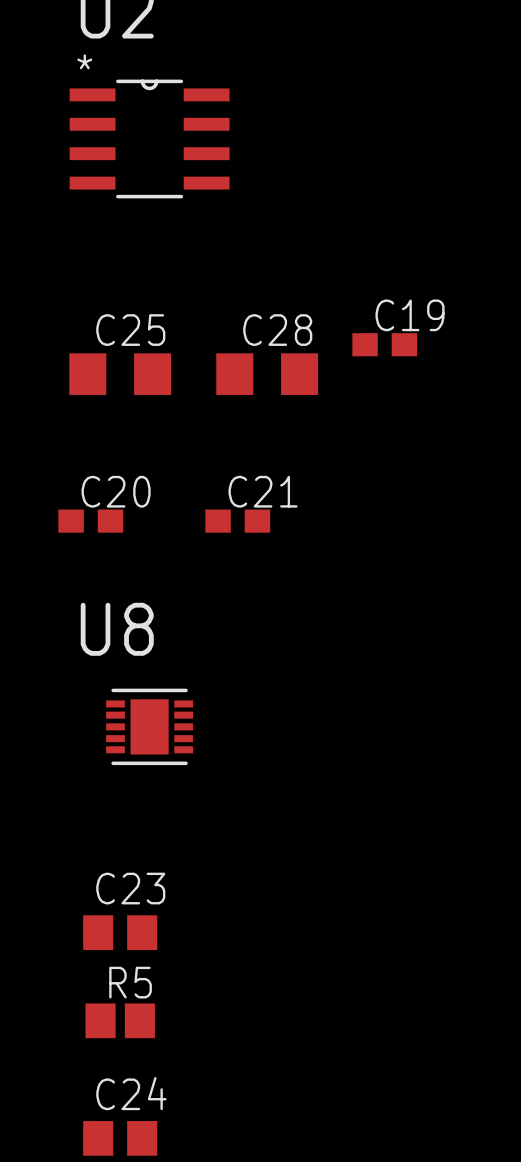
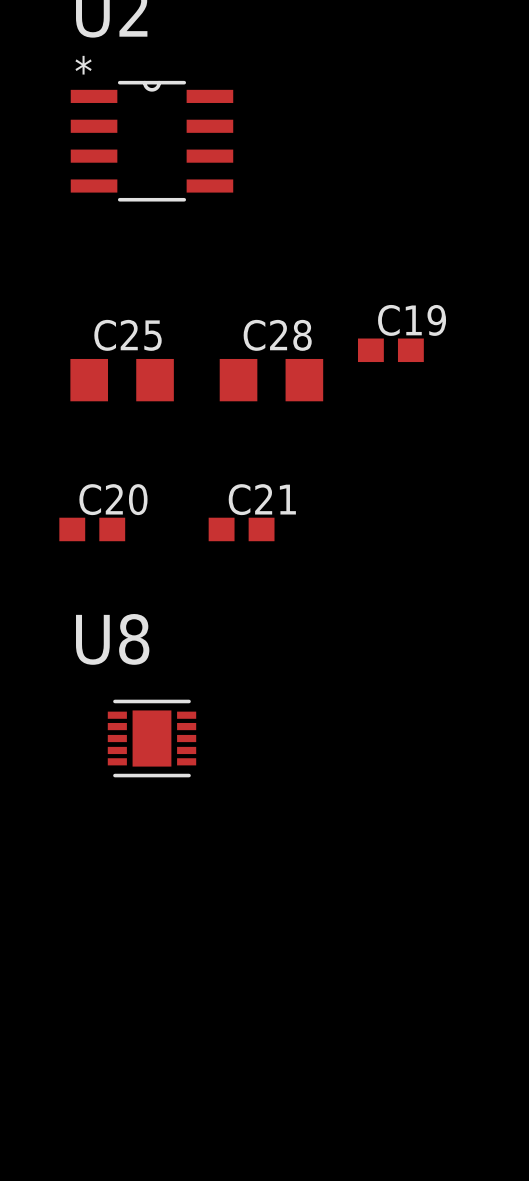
C23: (120, 932) -> none
R5: (120, 1020) -> none
C24: (120, 1138) -> none

